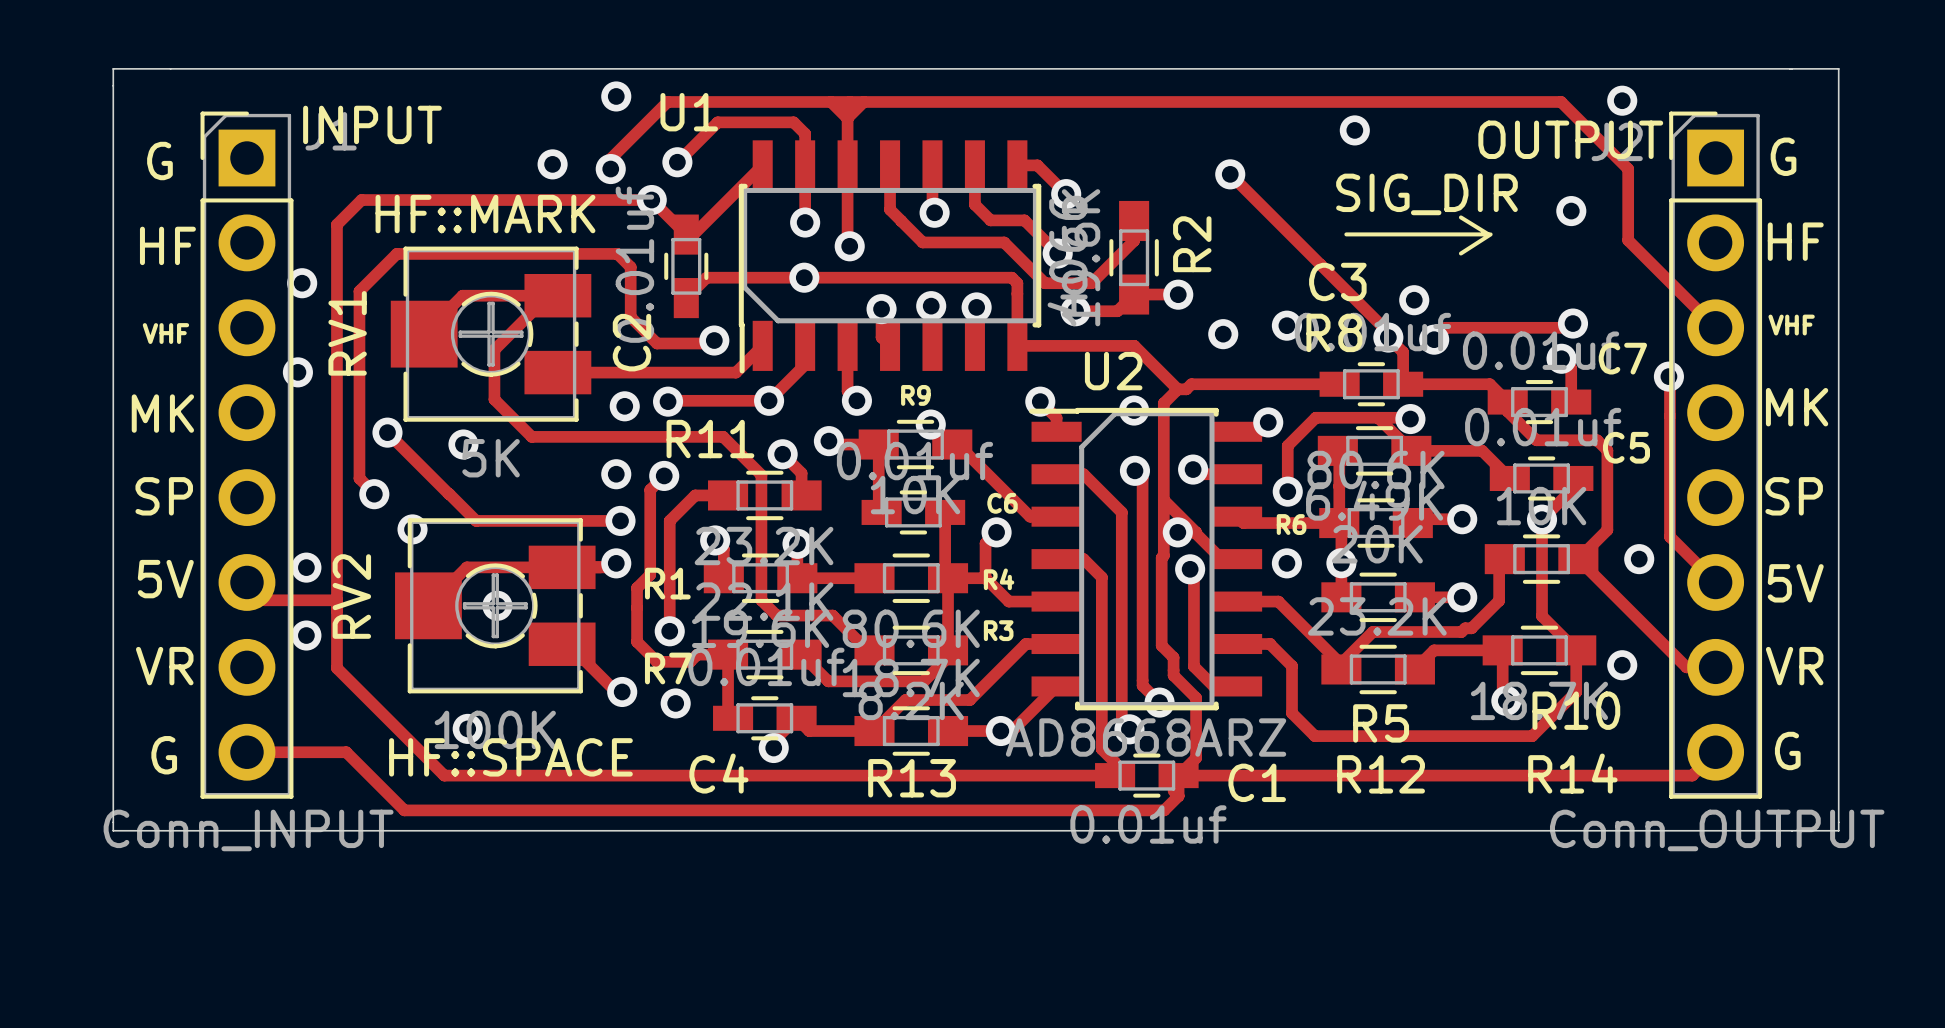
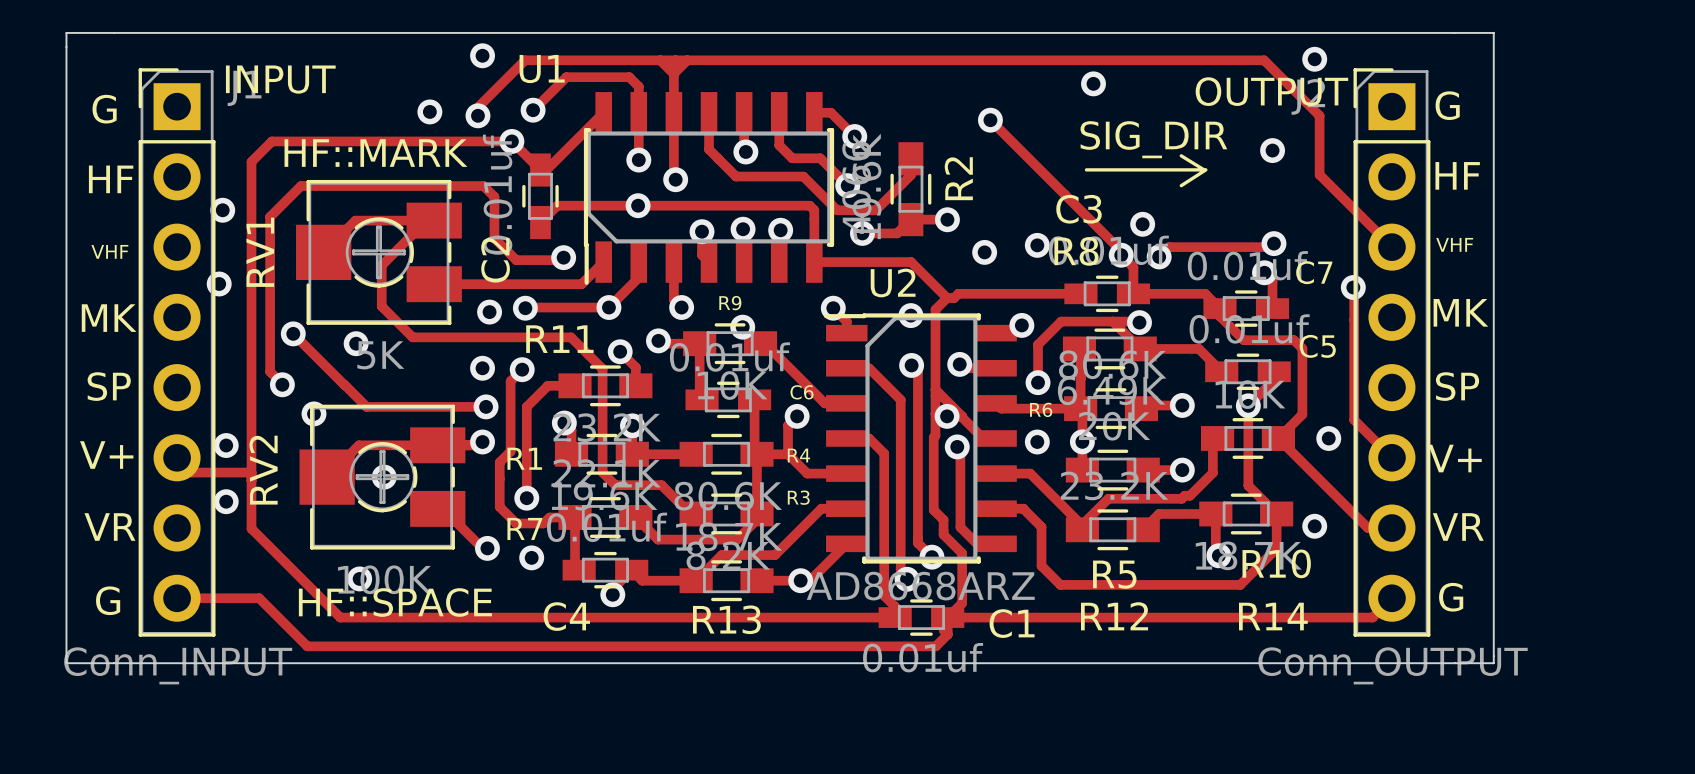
text: 5V (165, 579) -> V+ (106, 455)
text: 5V (1795, 583) -> V+ (1455, 458)

